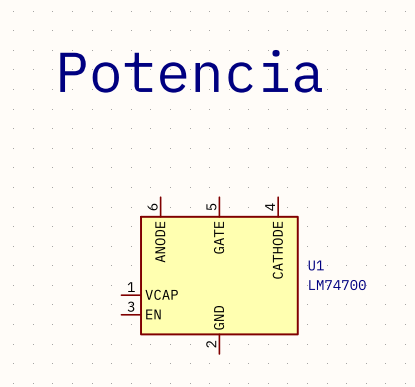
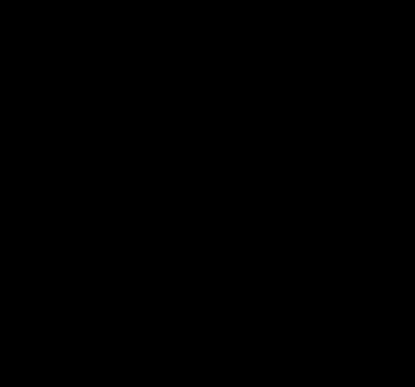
text: Potencia (191, 71) -> none
U1: LM74700 (210, 275) -> none

